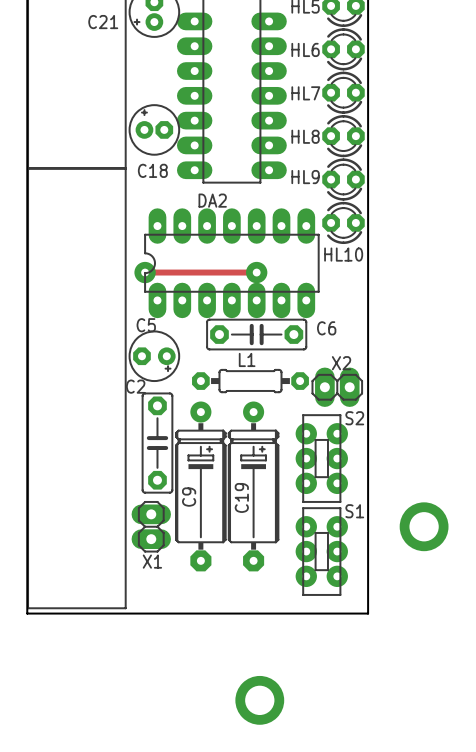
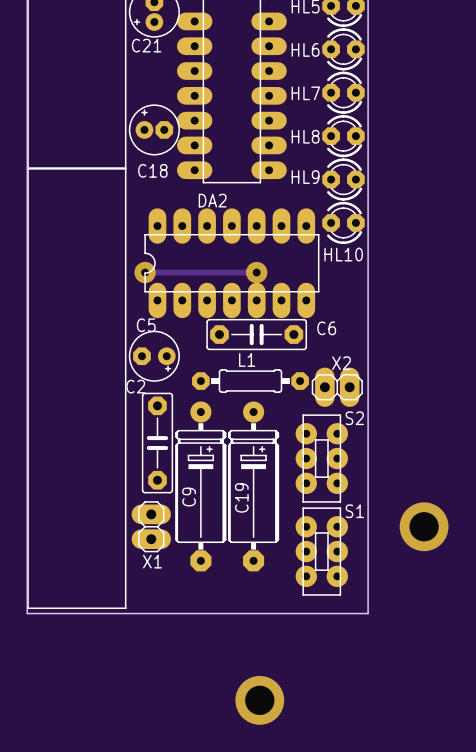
C21 name position: C21 (103, 22) -> C21 (146, 45)

